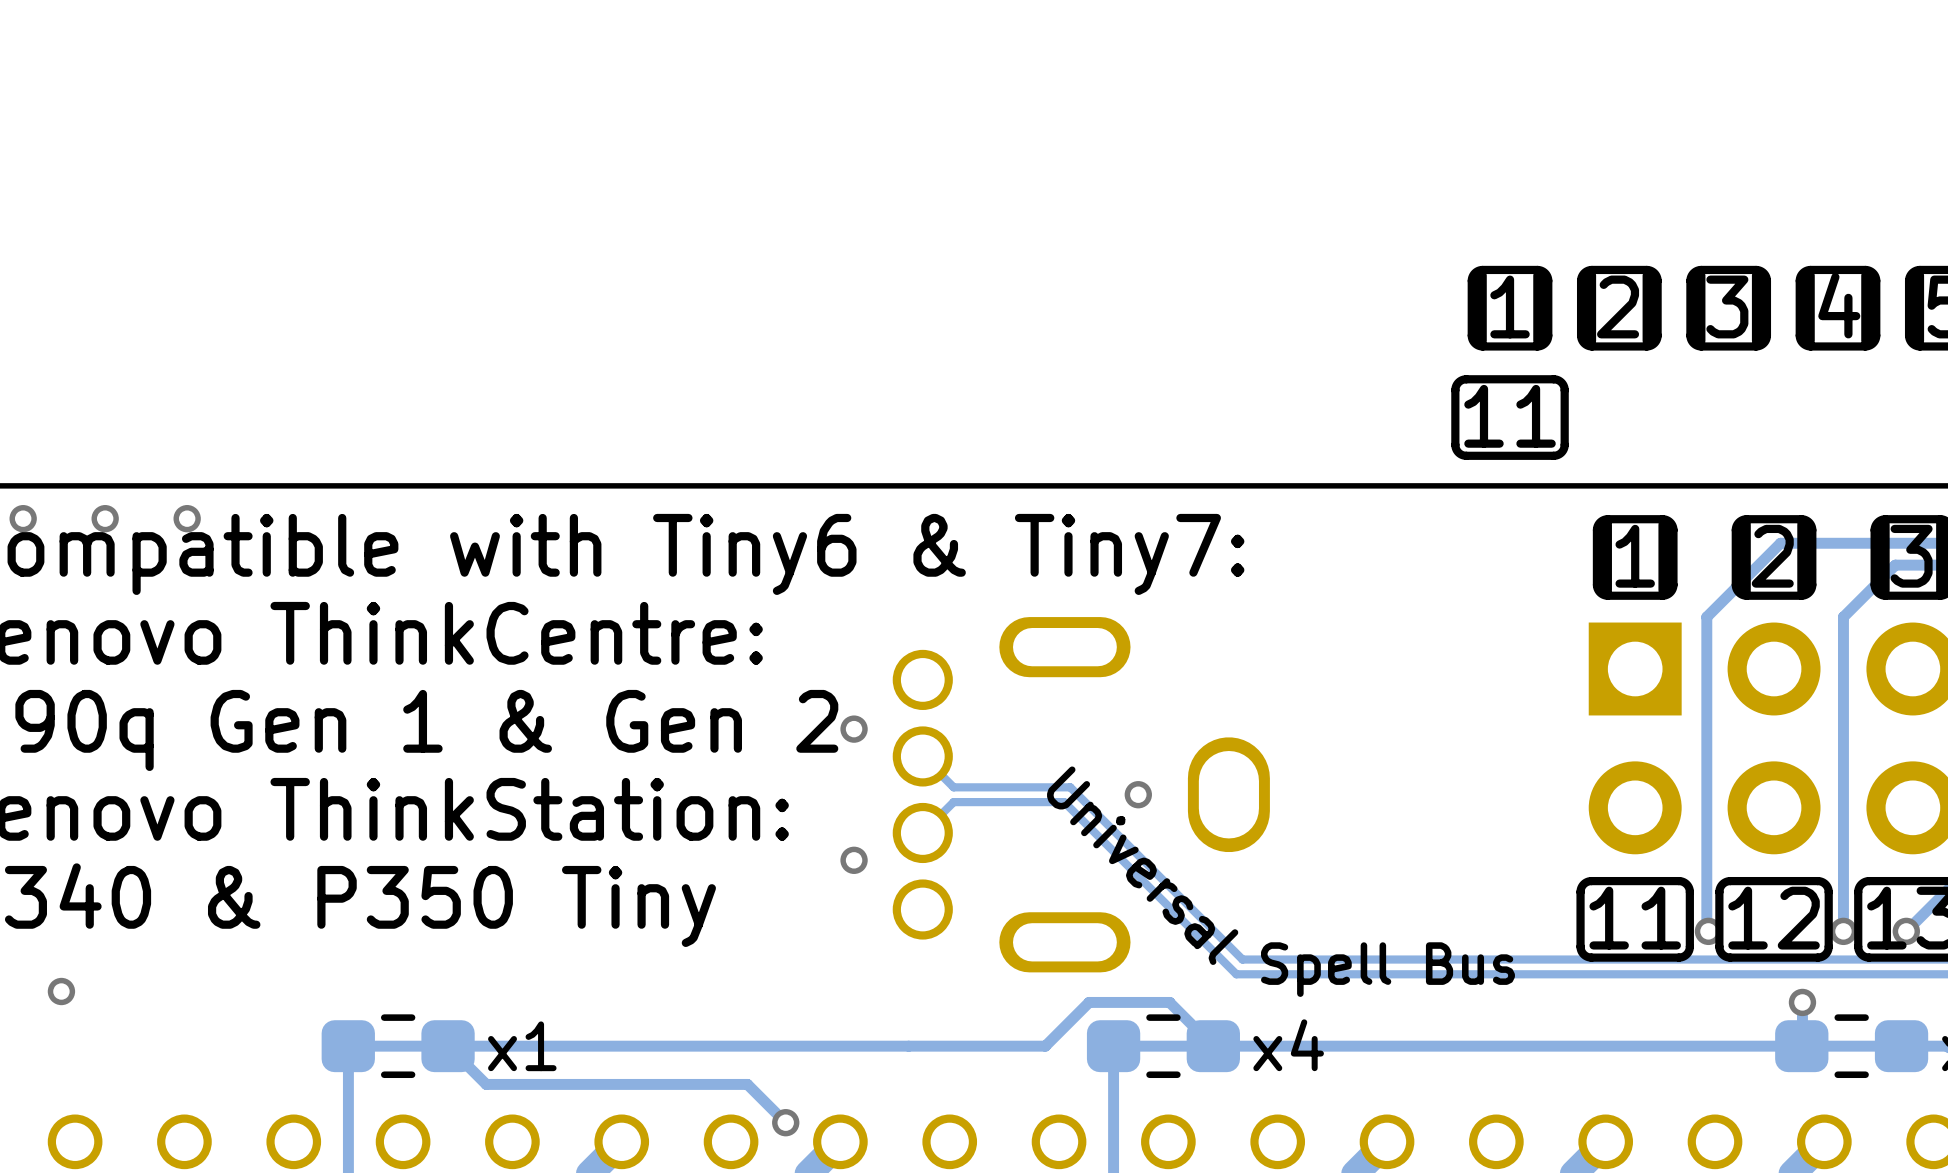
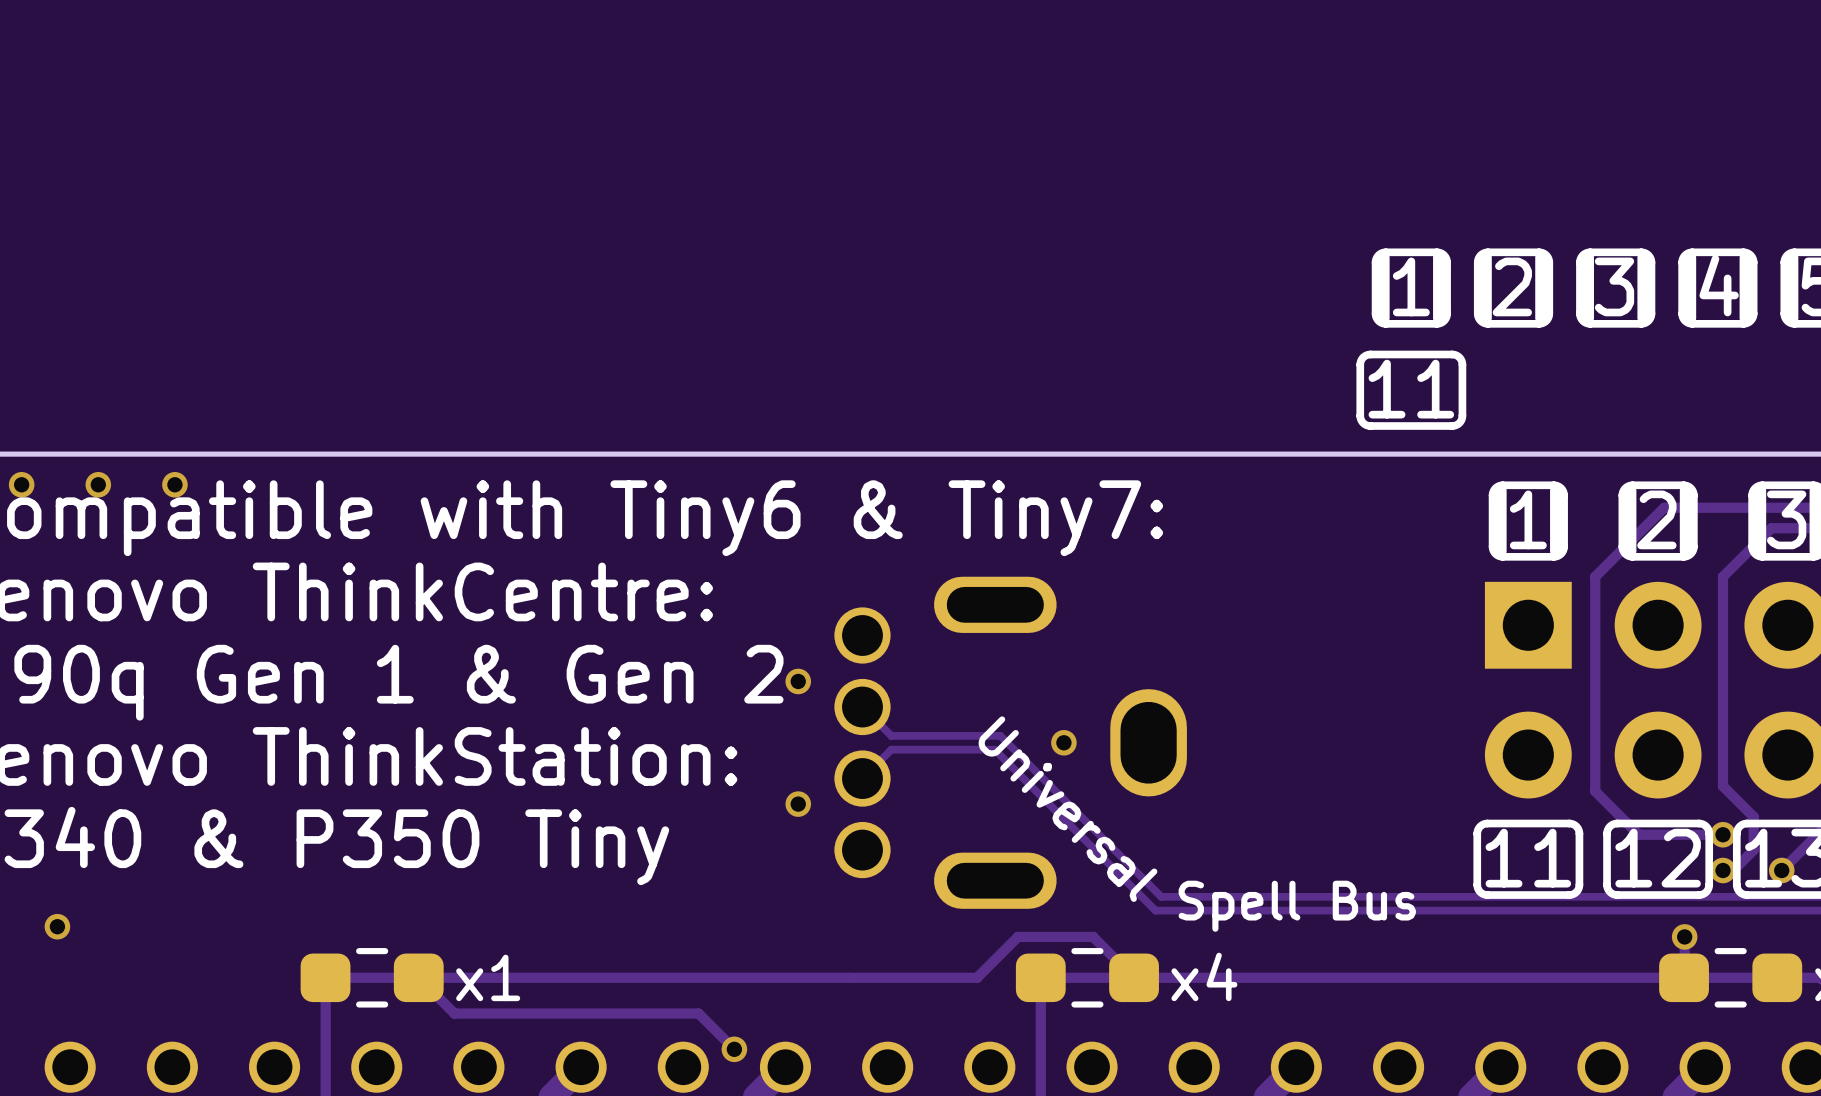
track: (1843, 841) (1843, 931) -> (1722, 786) (1753, 816) (1753, 850) (1733, 870) (1722, 870)
track: (1706, 846) (1706, 929) (1708, 931) -> (1595, 791) (1638, 834) (1722, 834)
via position: (1708, 931) -> (1722, 834)

